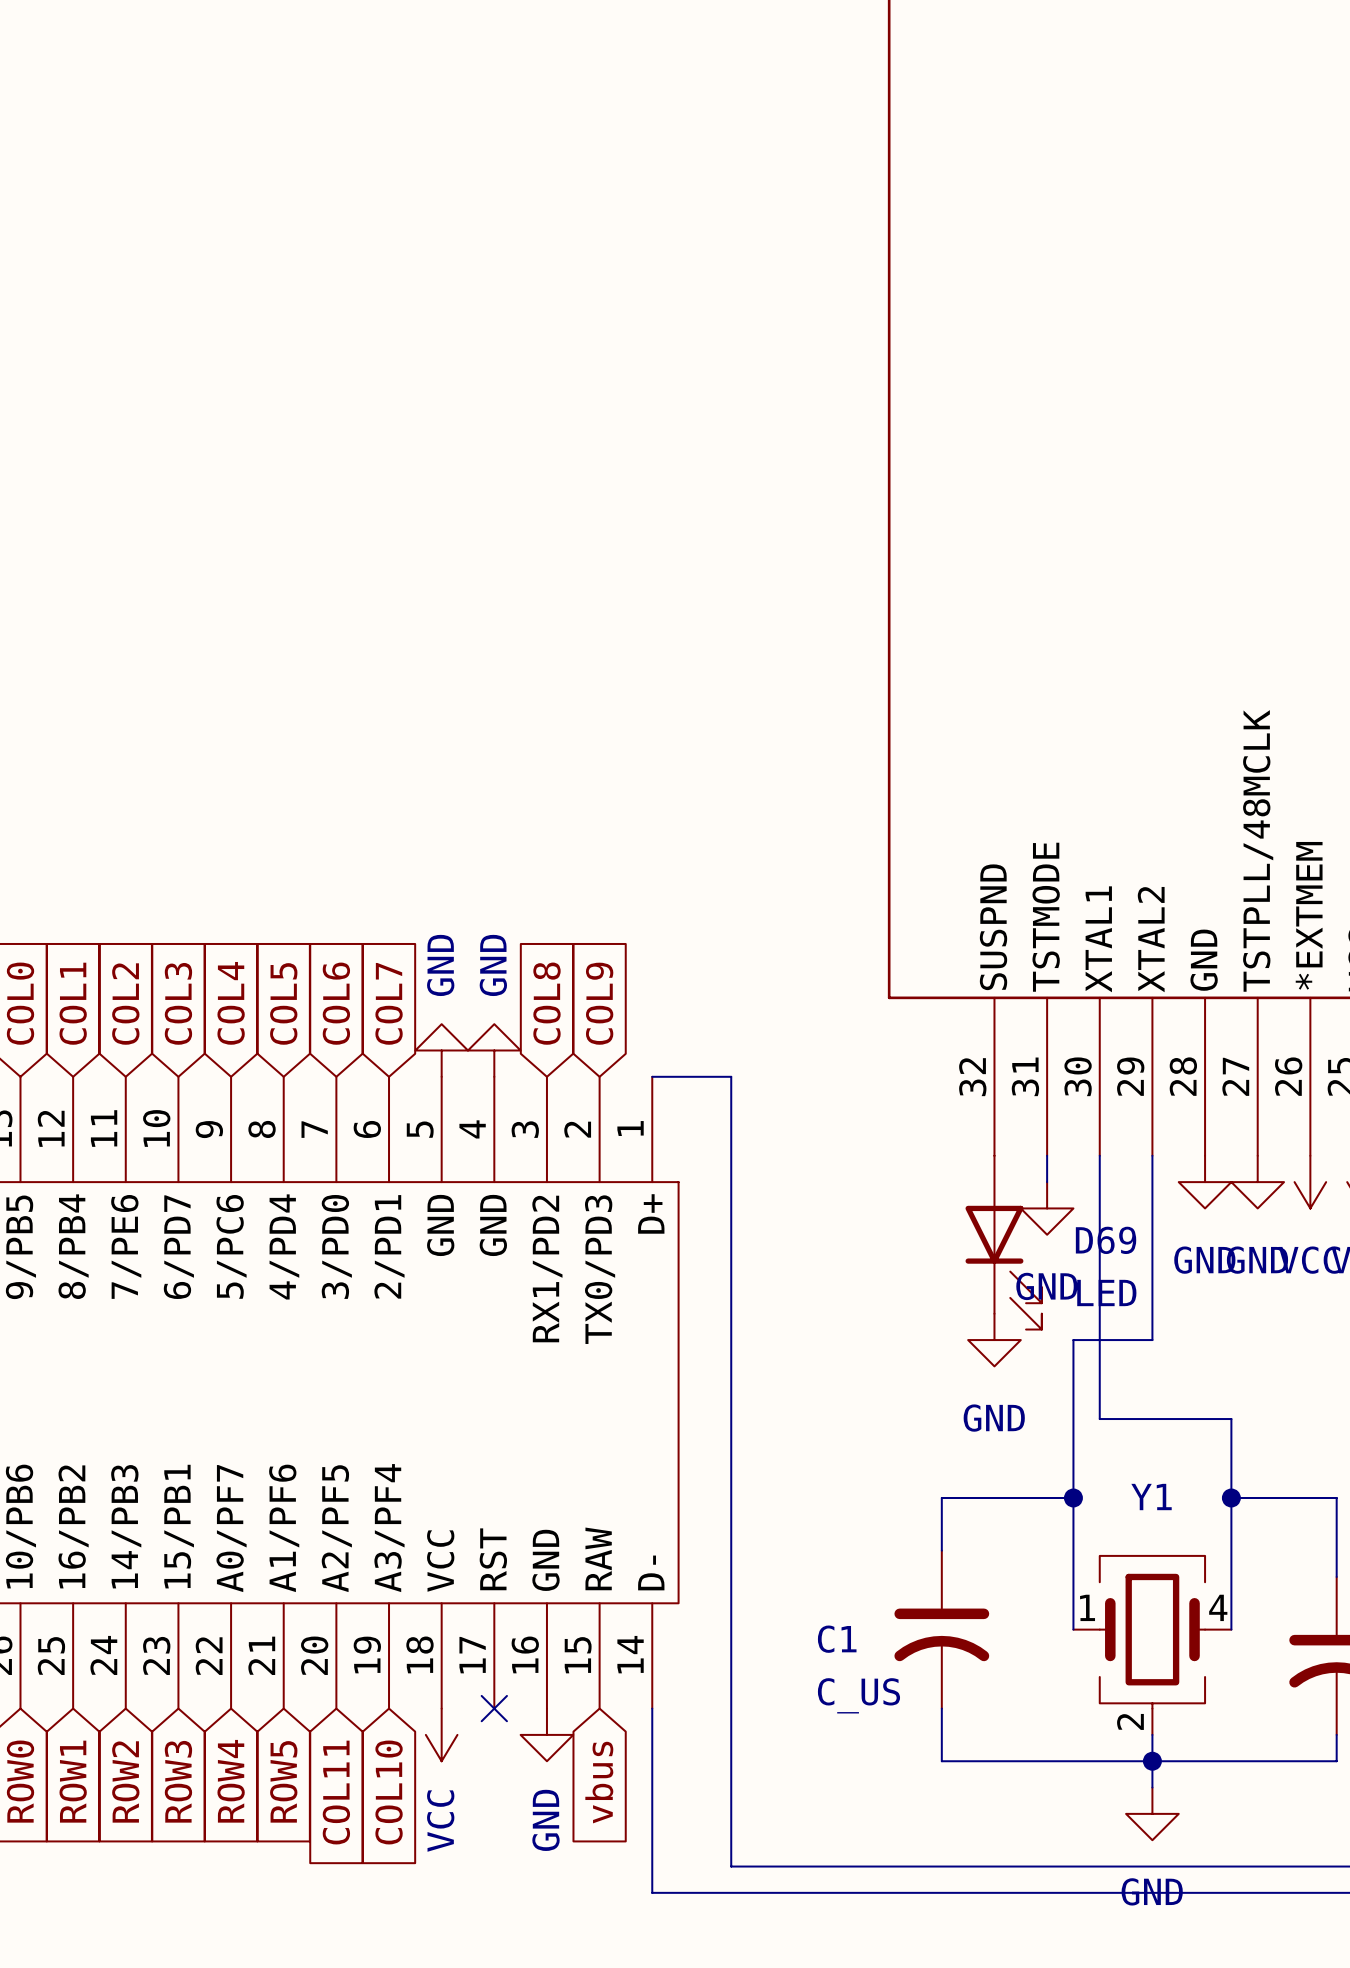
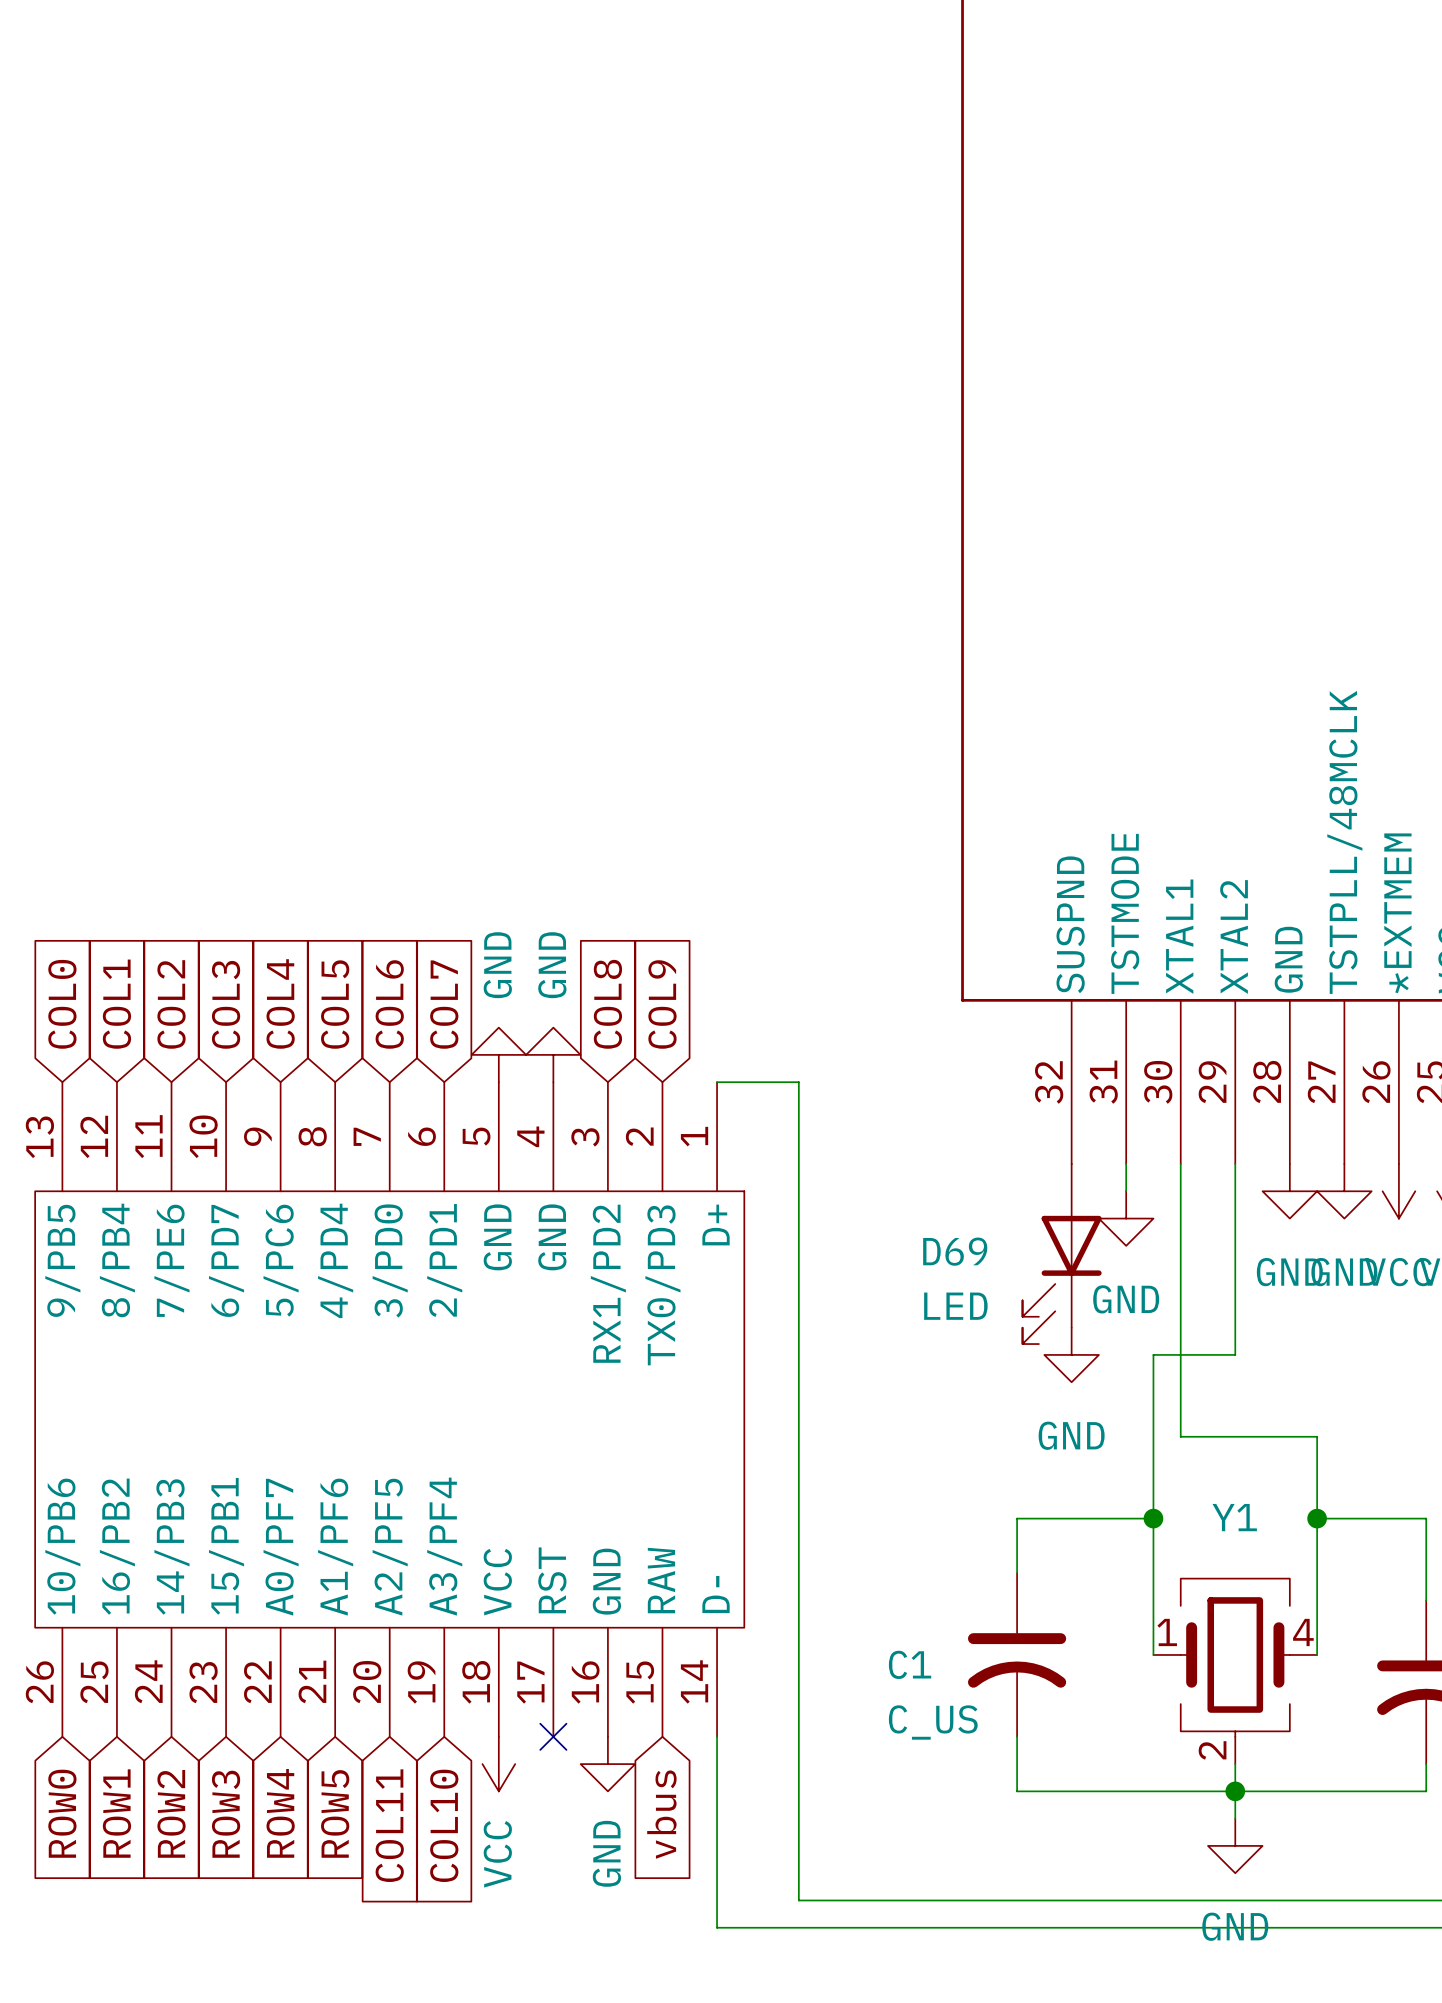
D69 flip: as is (1003, 1267) -> left-right (1062, 1279)

